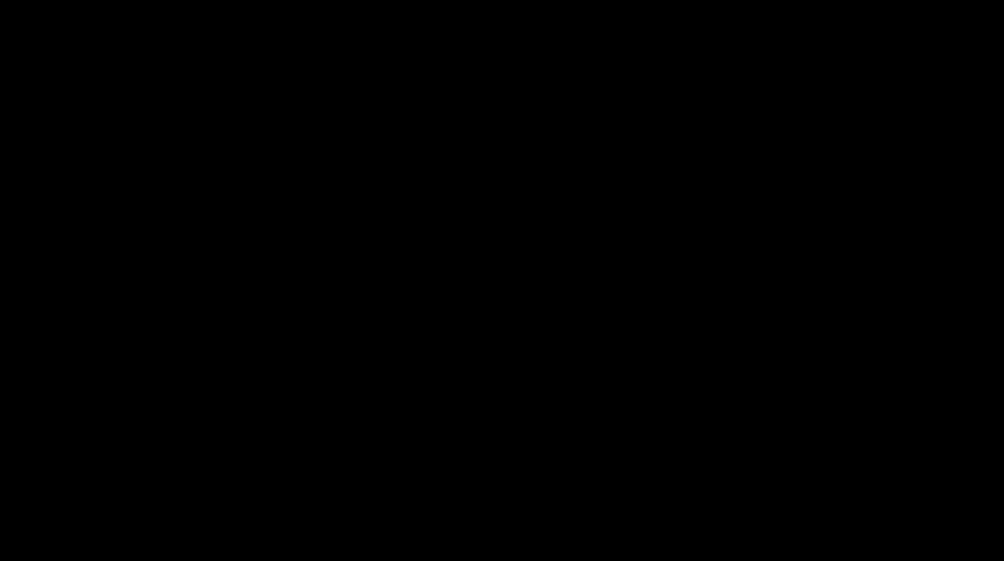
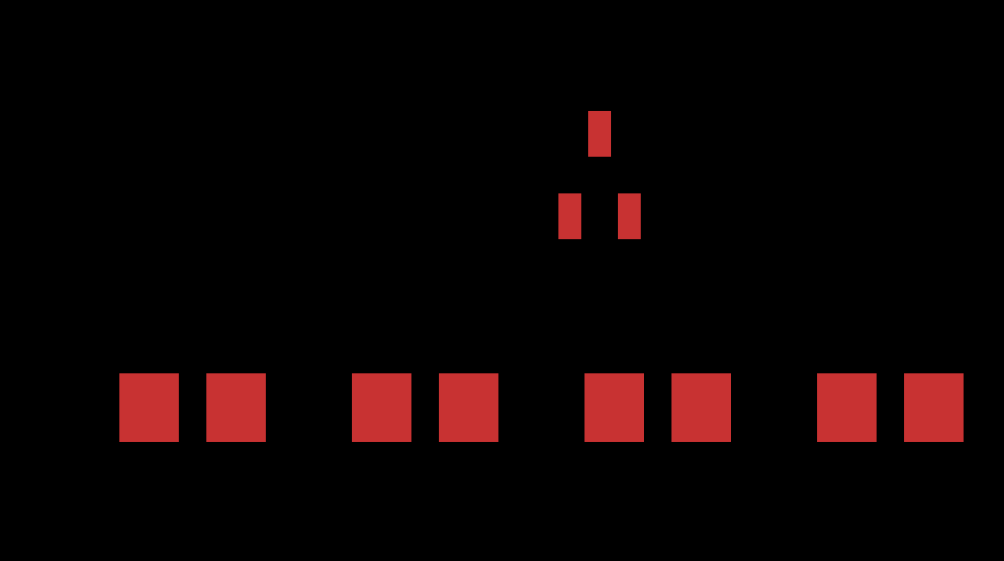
part: none -> (599, 175)
part: none -> (192, 407)
part: none -> (425, 407)
part: none -> (657, 407)
part: none -> (890, 407)

